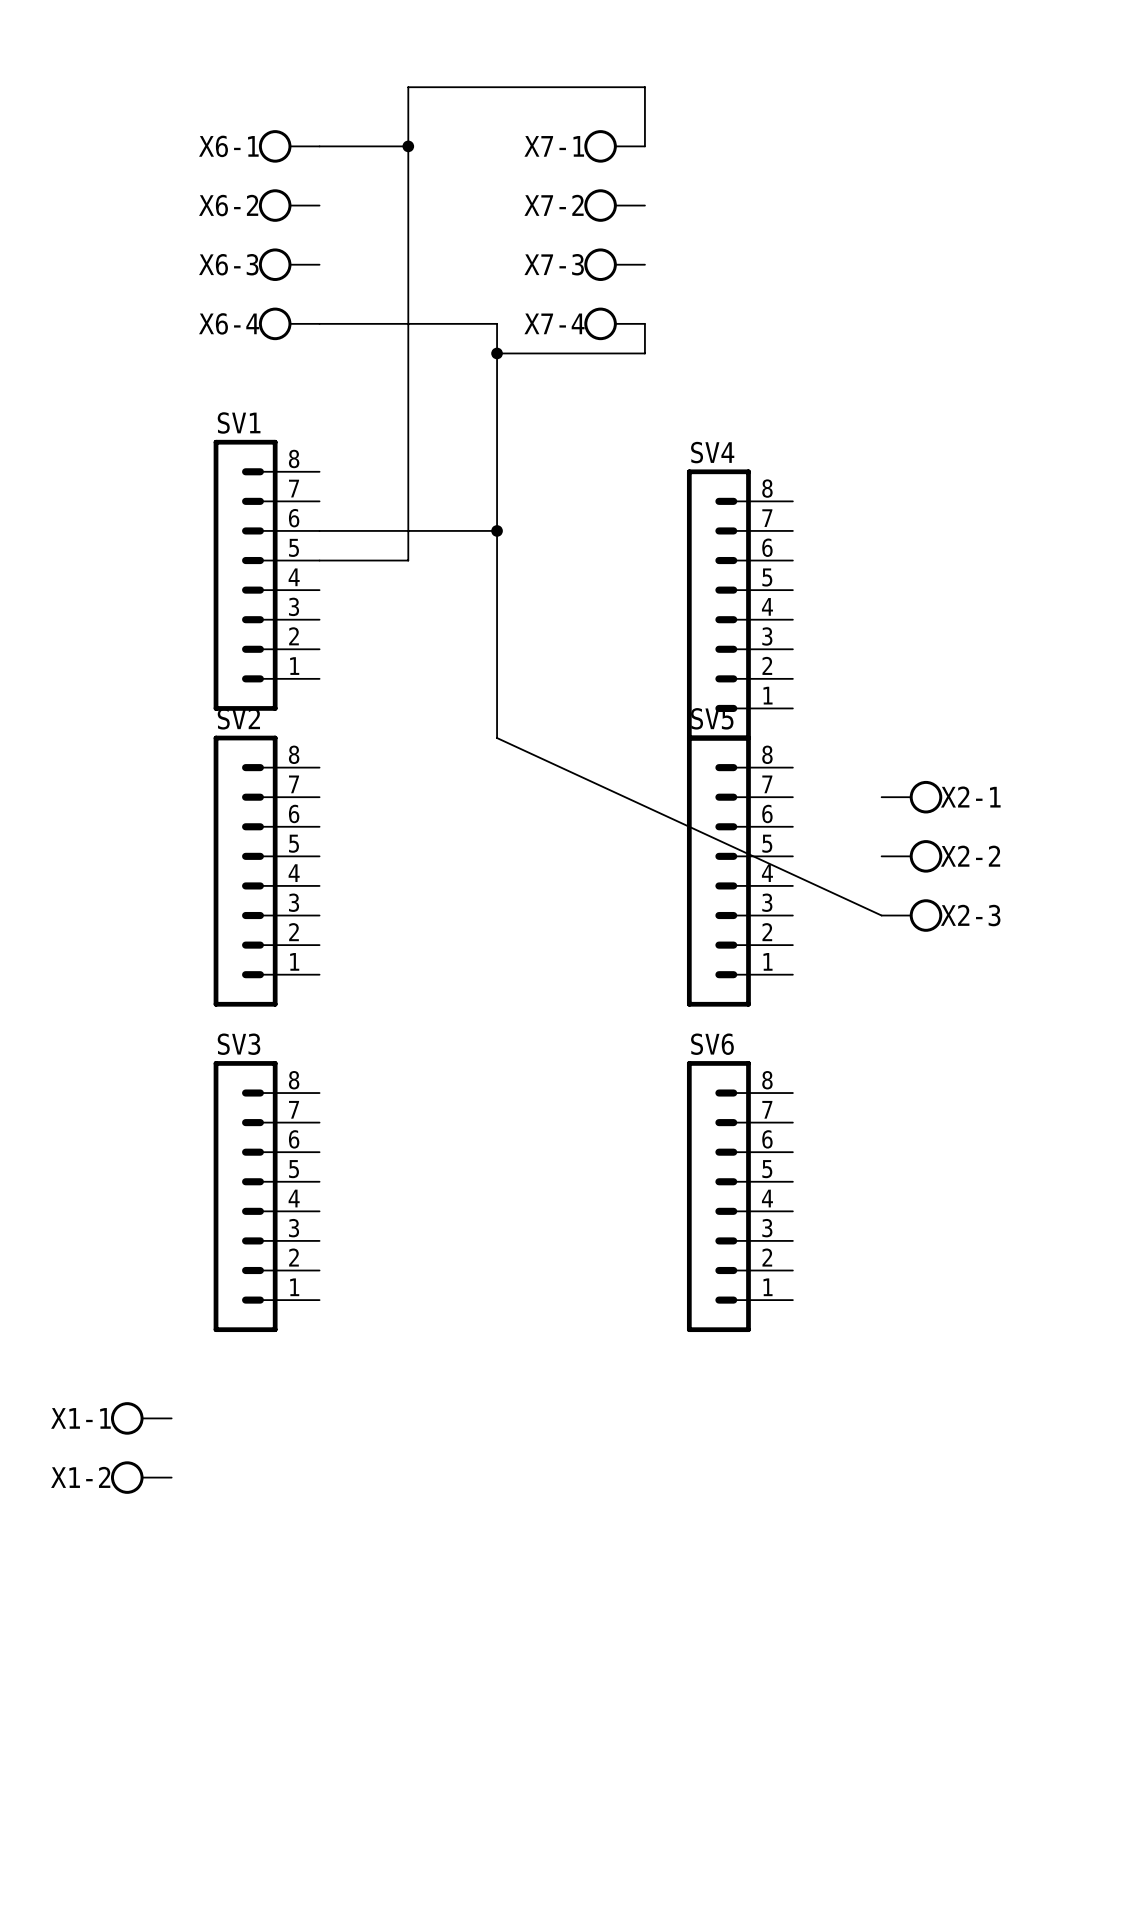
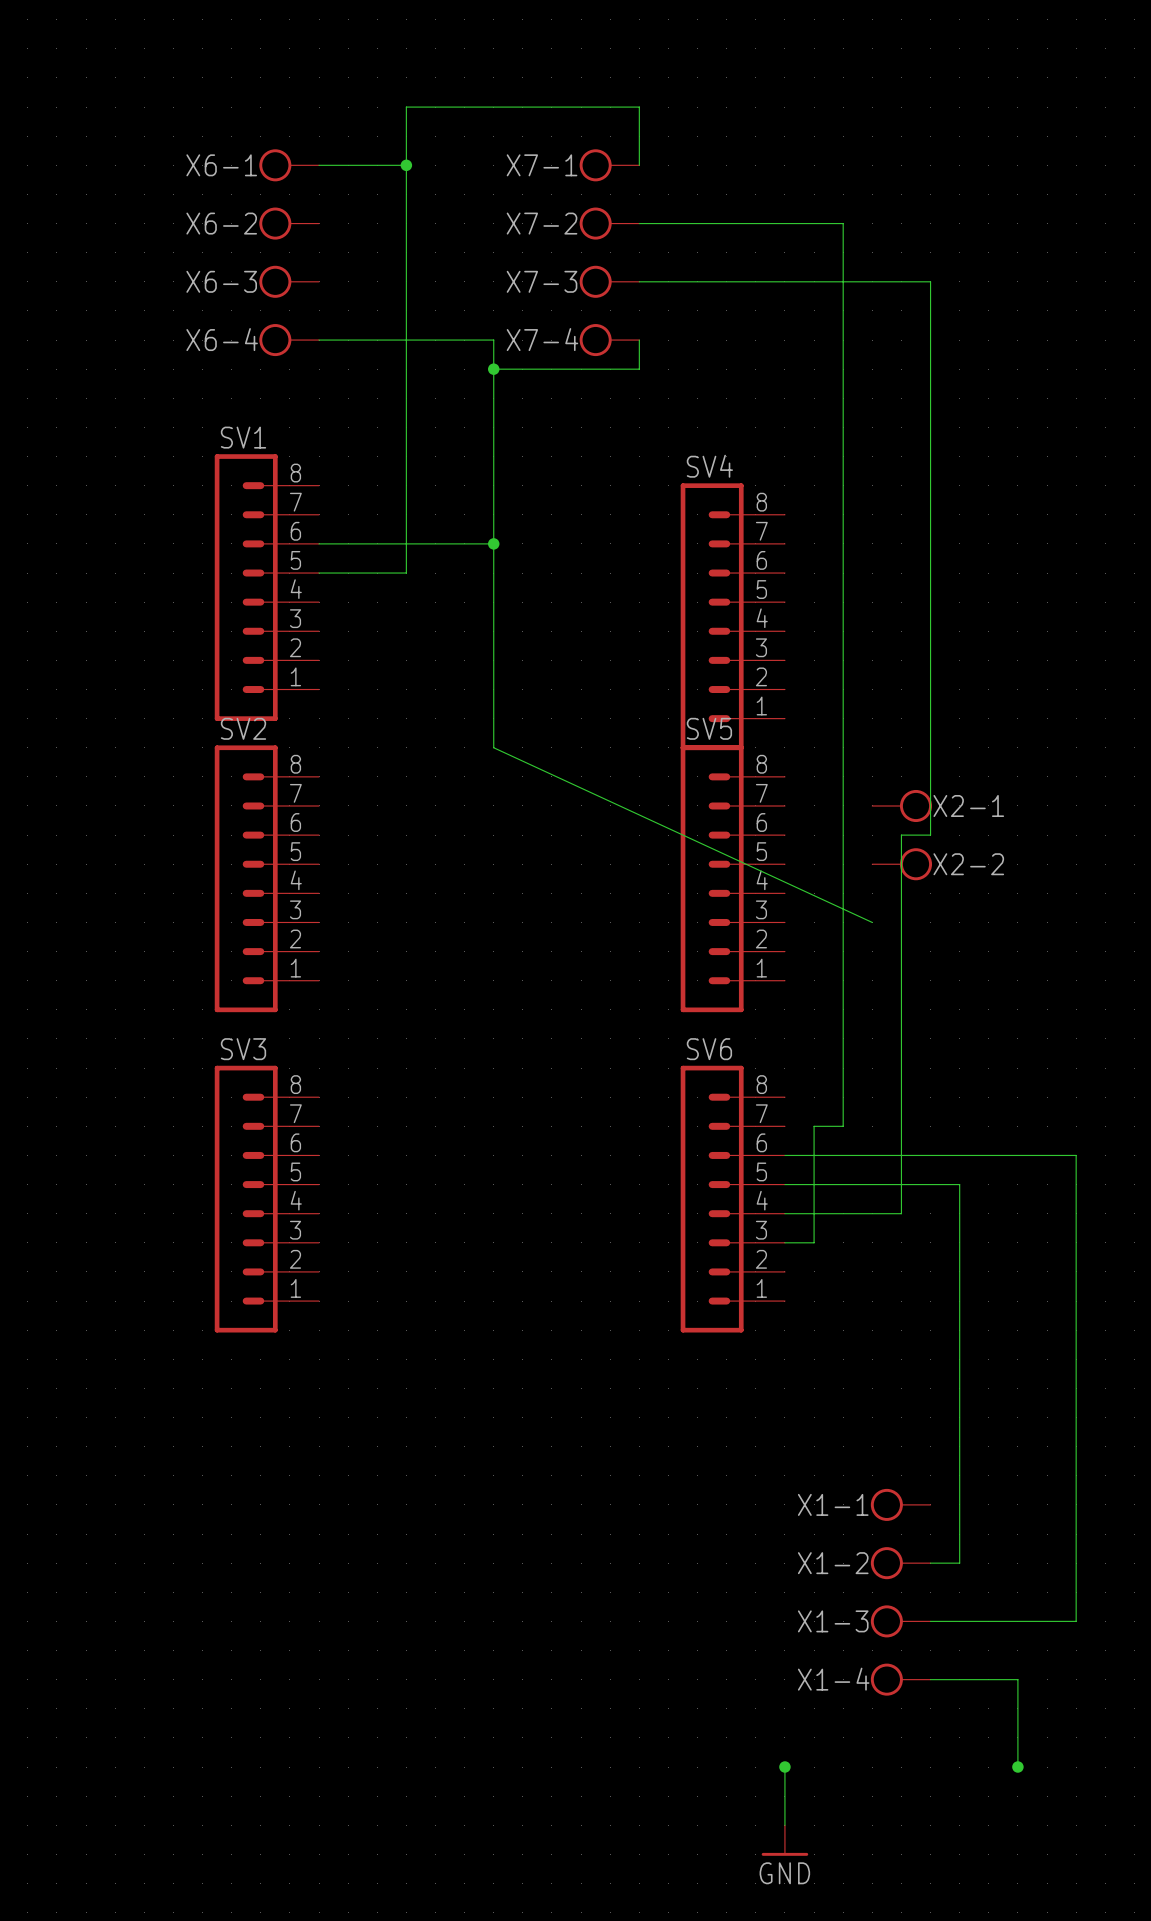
wire: none -> (639, 223) (843, 223) (843, 1126) (814, 1126) (814, 1242) (784, 1242)
wire: none -> (639, 281) (930, 281) (930, 835) (901, 835) (901, 1213) (784, 1213)
X2-3: (911, 915) -> none
wire: none -> (784, 1155) (1076, 1155) (1076, 1621) (930, 1621)
wire: none -> (784, 1184) (959, 1184) (959, 1563) (930, 1563)
X1-1 position: (141, 1418) -> (900, 1504)
X1-2 position: (141, 1477) -> (900, 1563)
X1-3: none -> (900, 1621)
X1-4: none -> (900, 1679)
wire: none -> (930, 1679) (1017, 1679) (1017, 1767)
wire: none -> (784, 1767) (784, 1825)
junction: none -> (784, 1767)
junction: none -> (1017, 1767)
power symbol: none -> GND (784, 1840)

